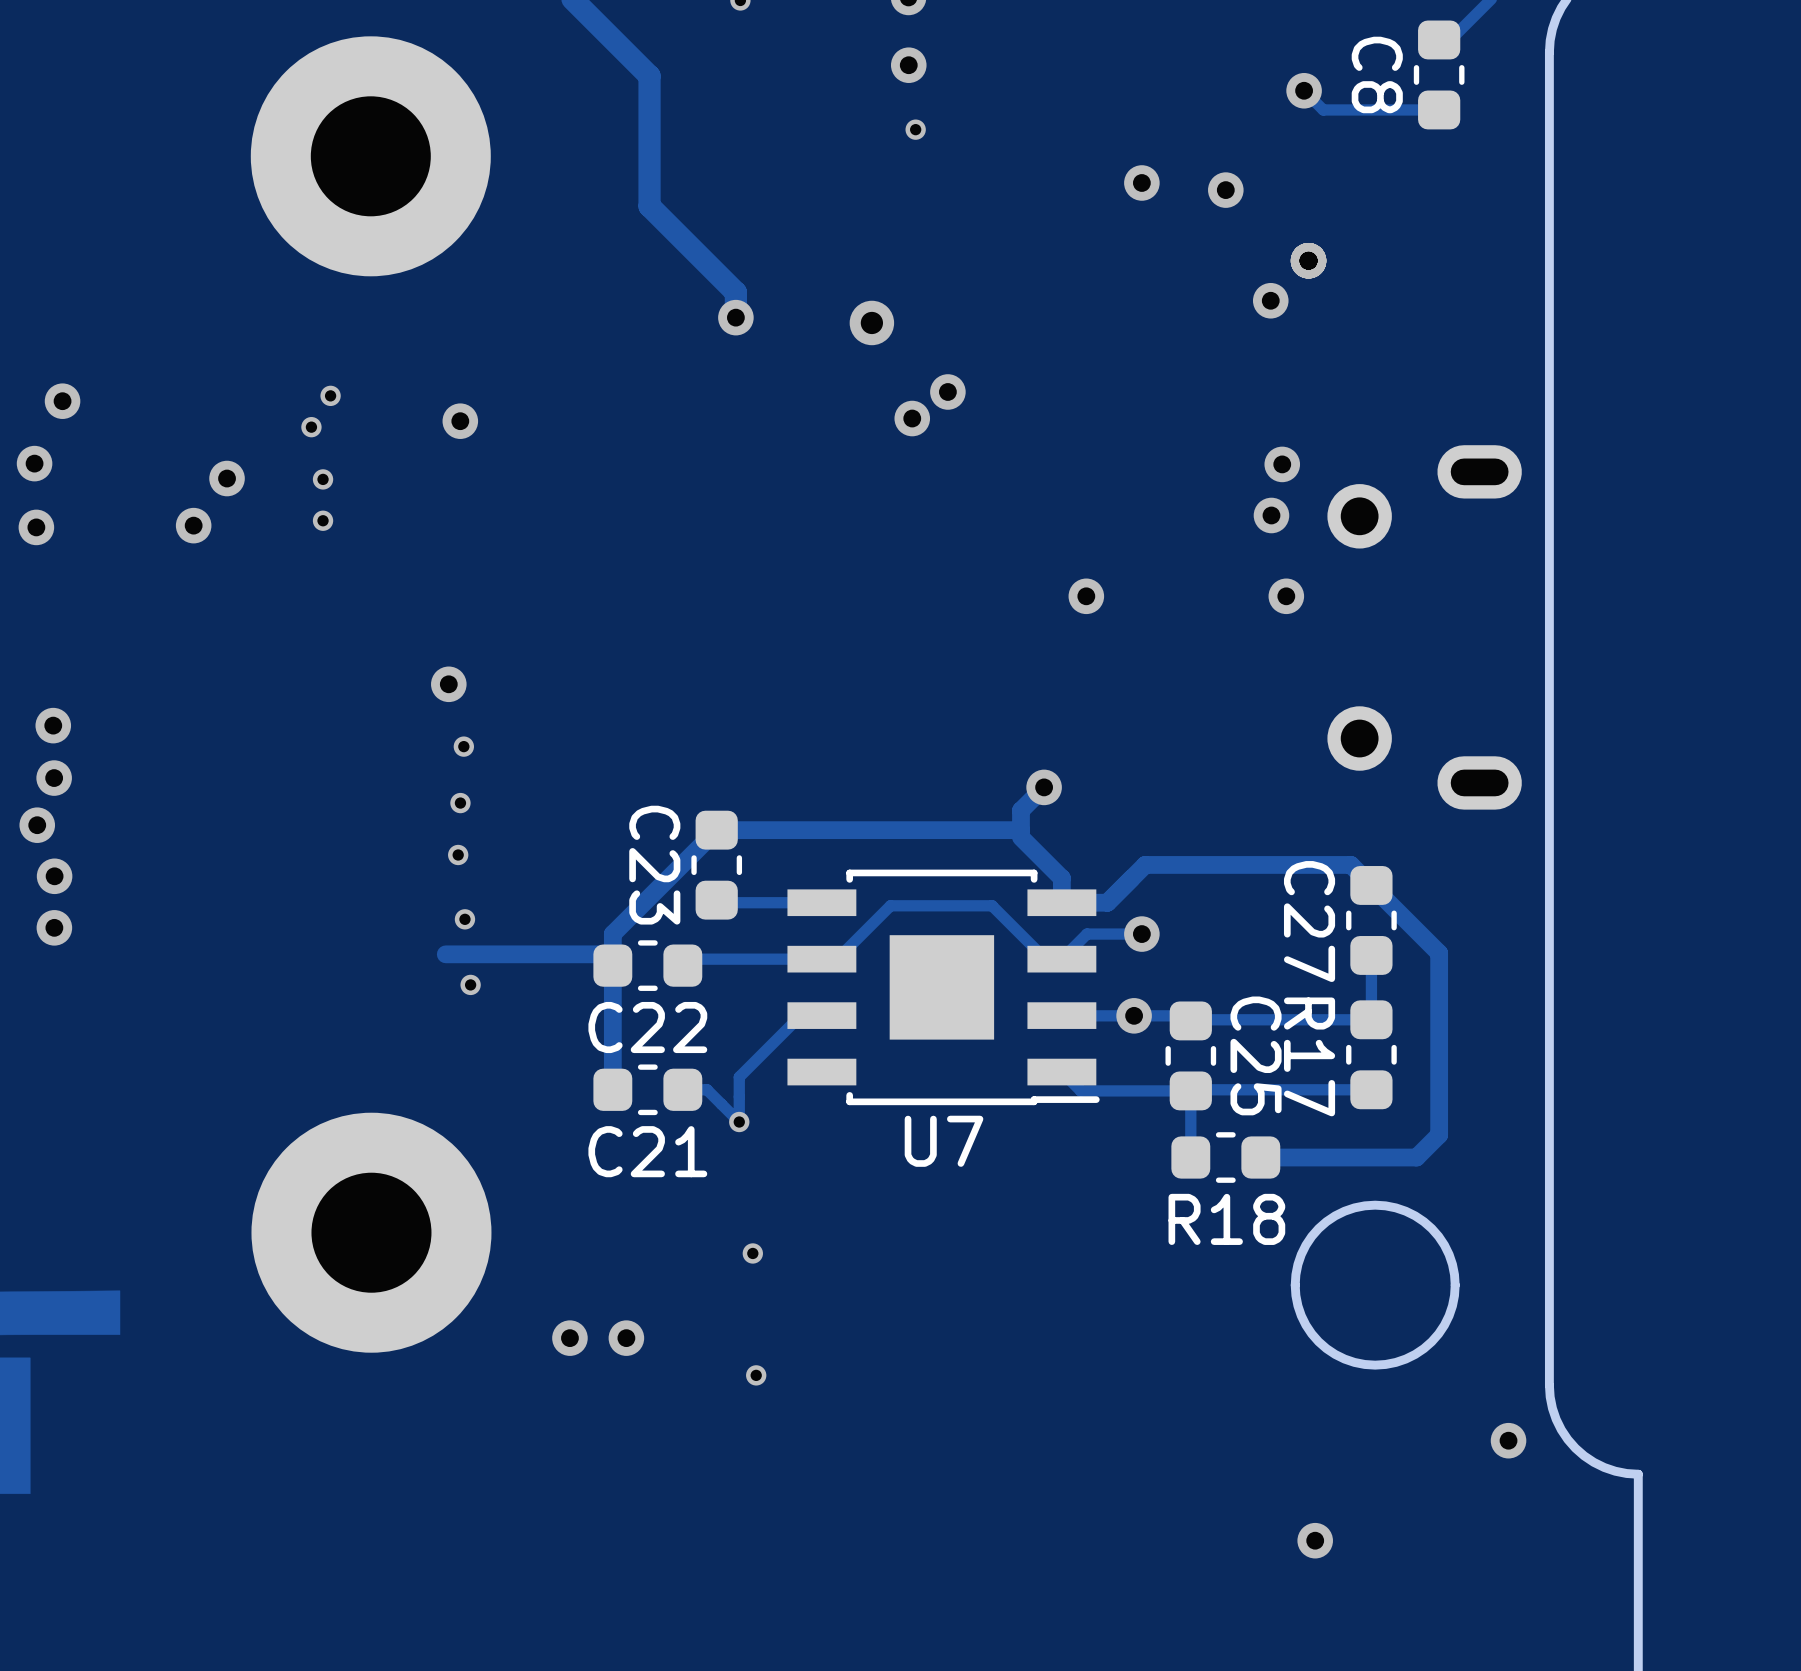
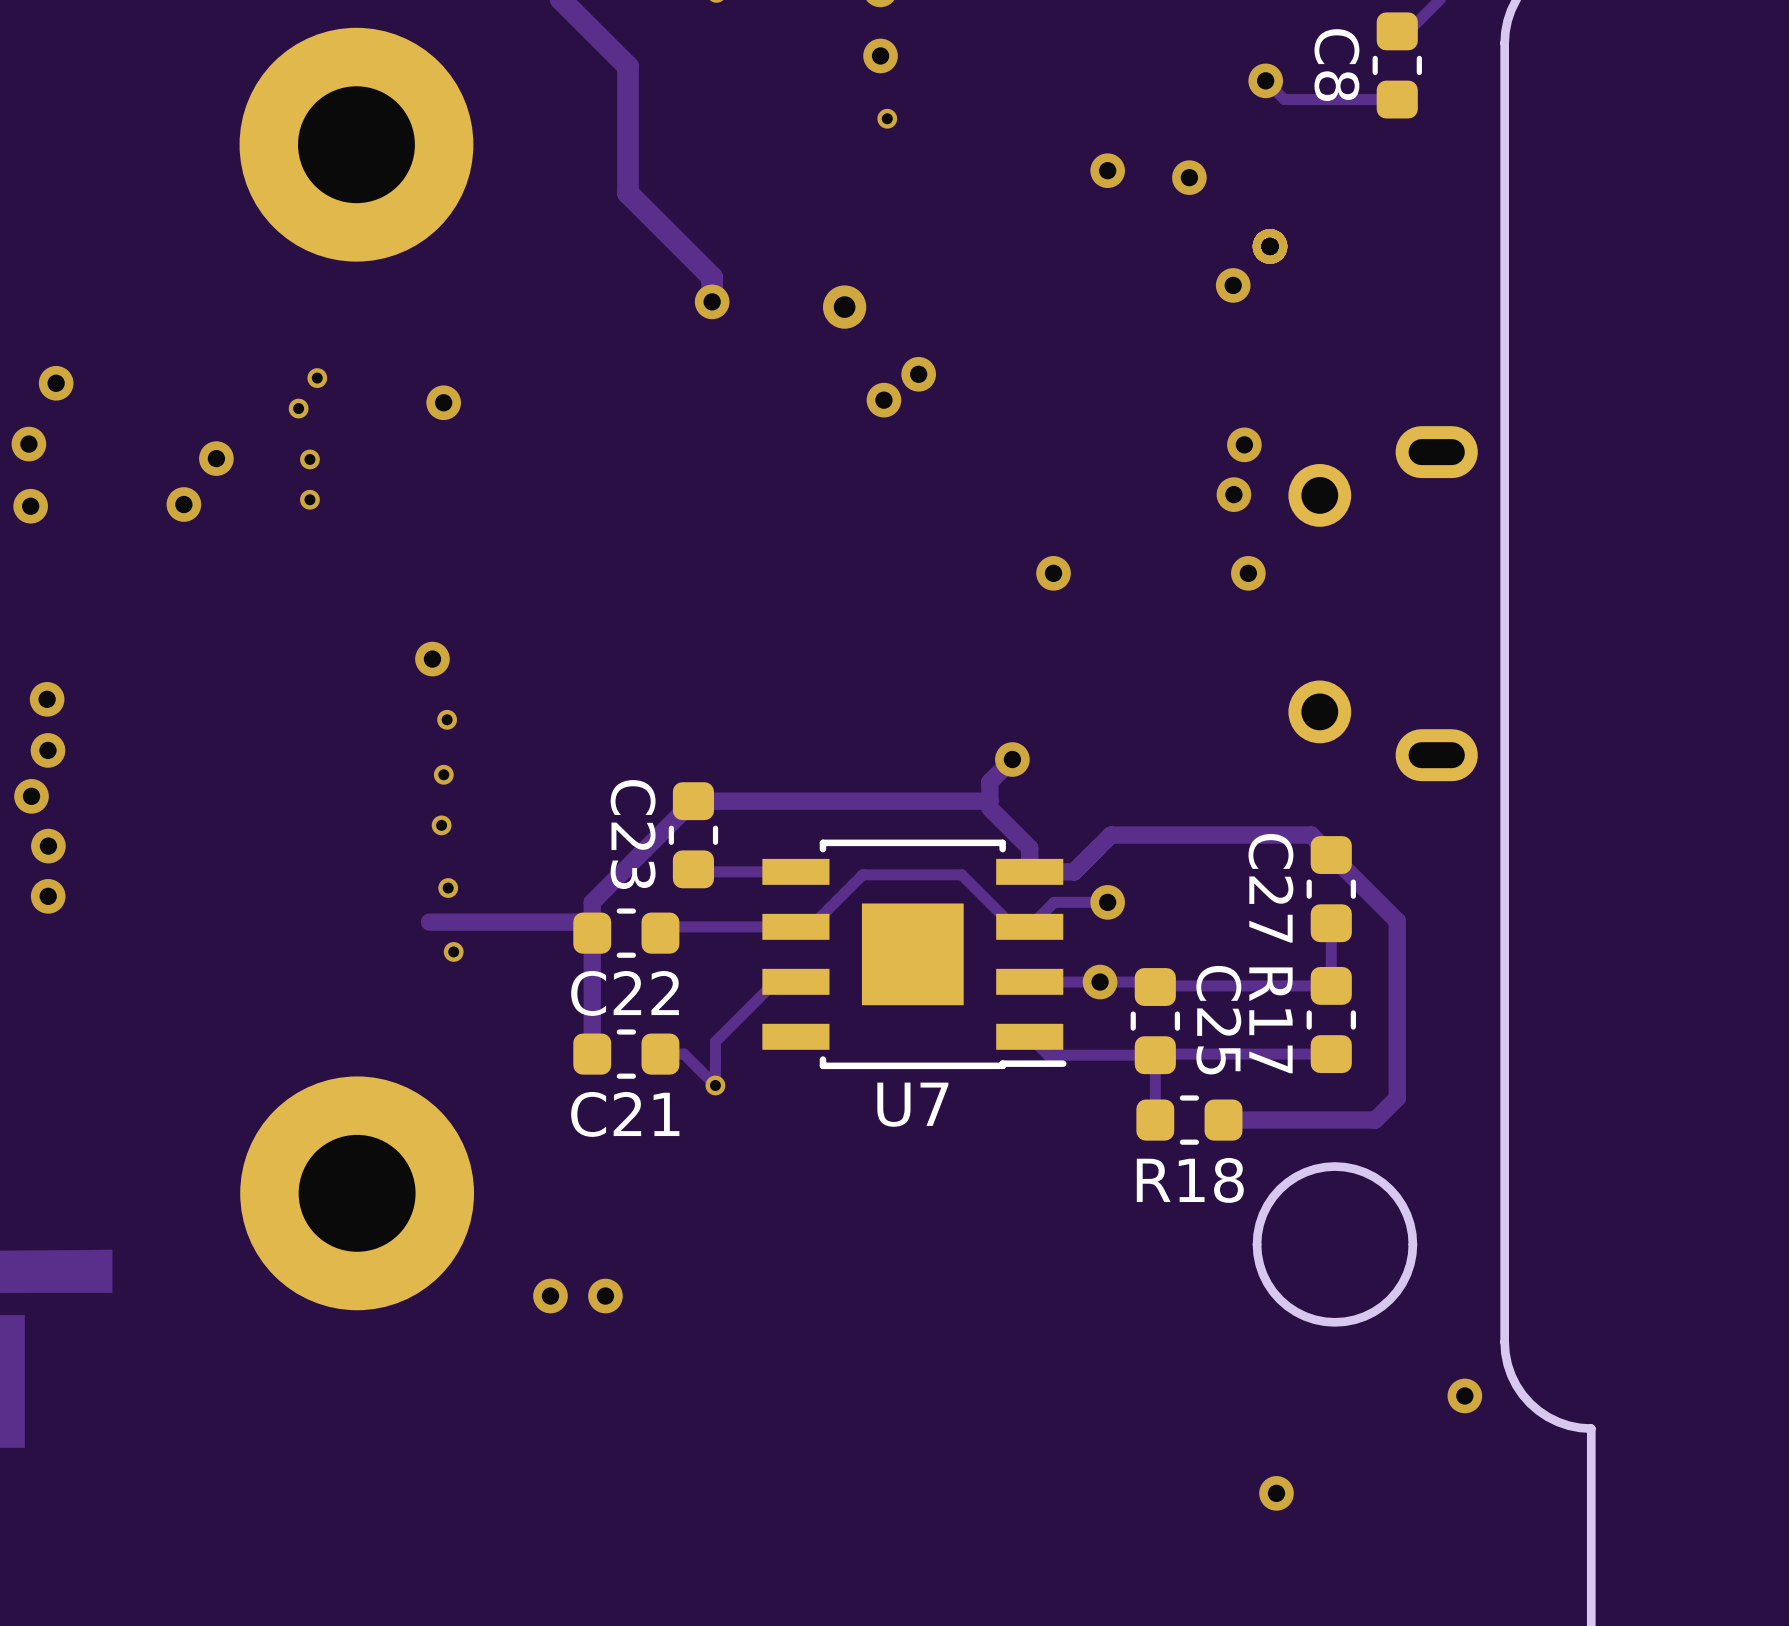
via: (752, 1253) -> none
via: (756, 1375) -> none

